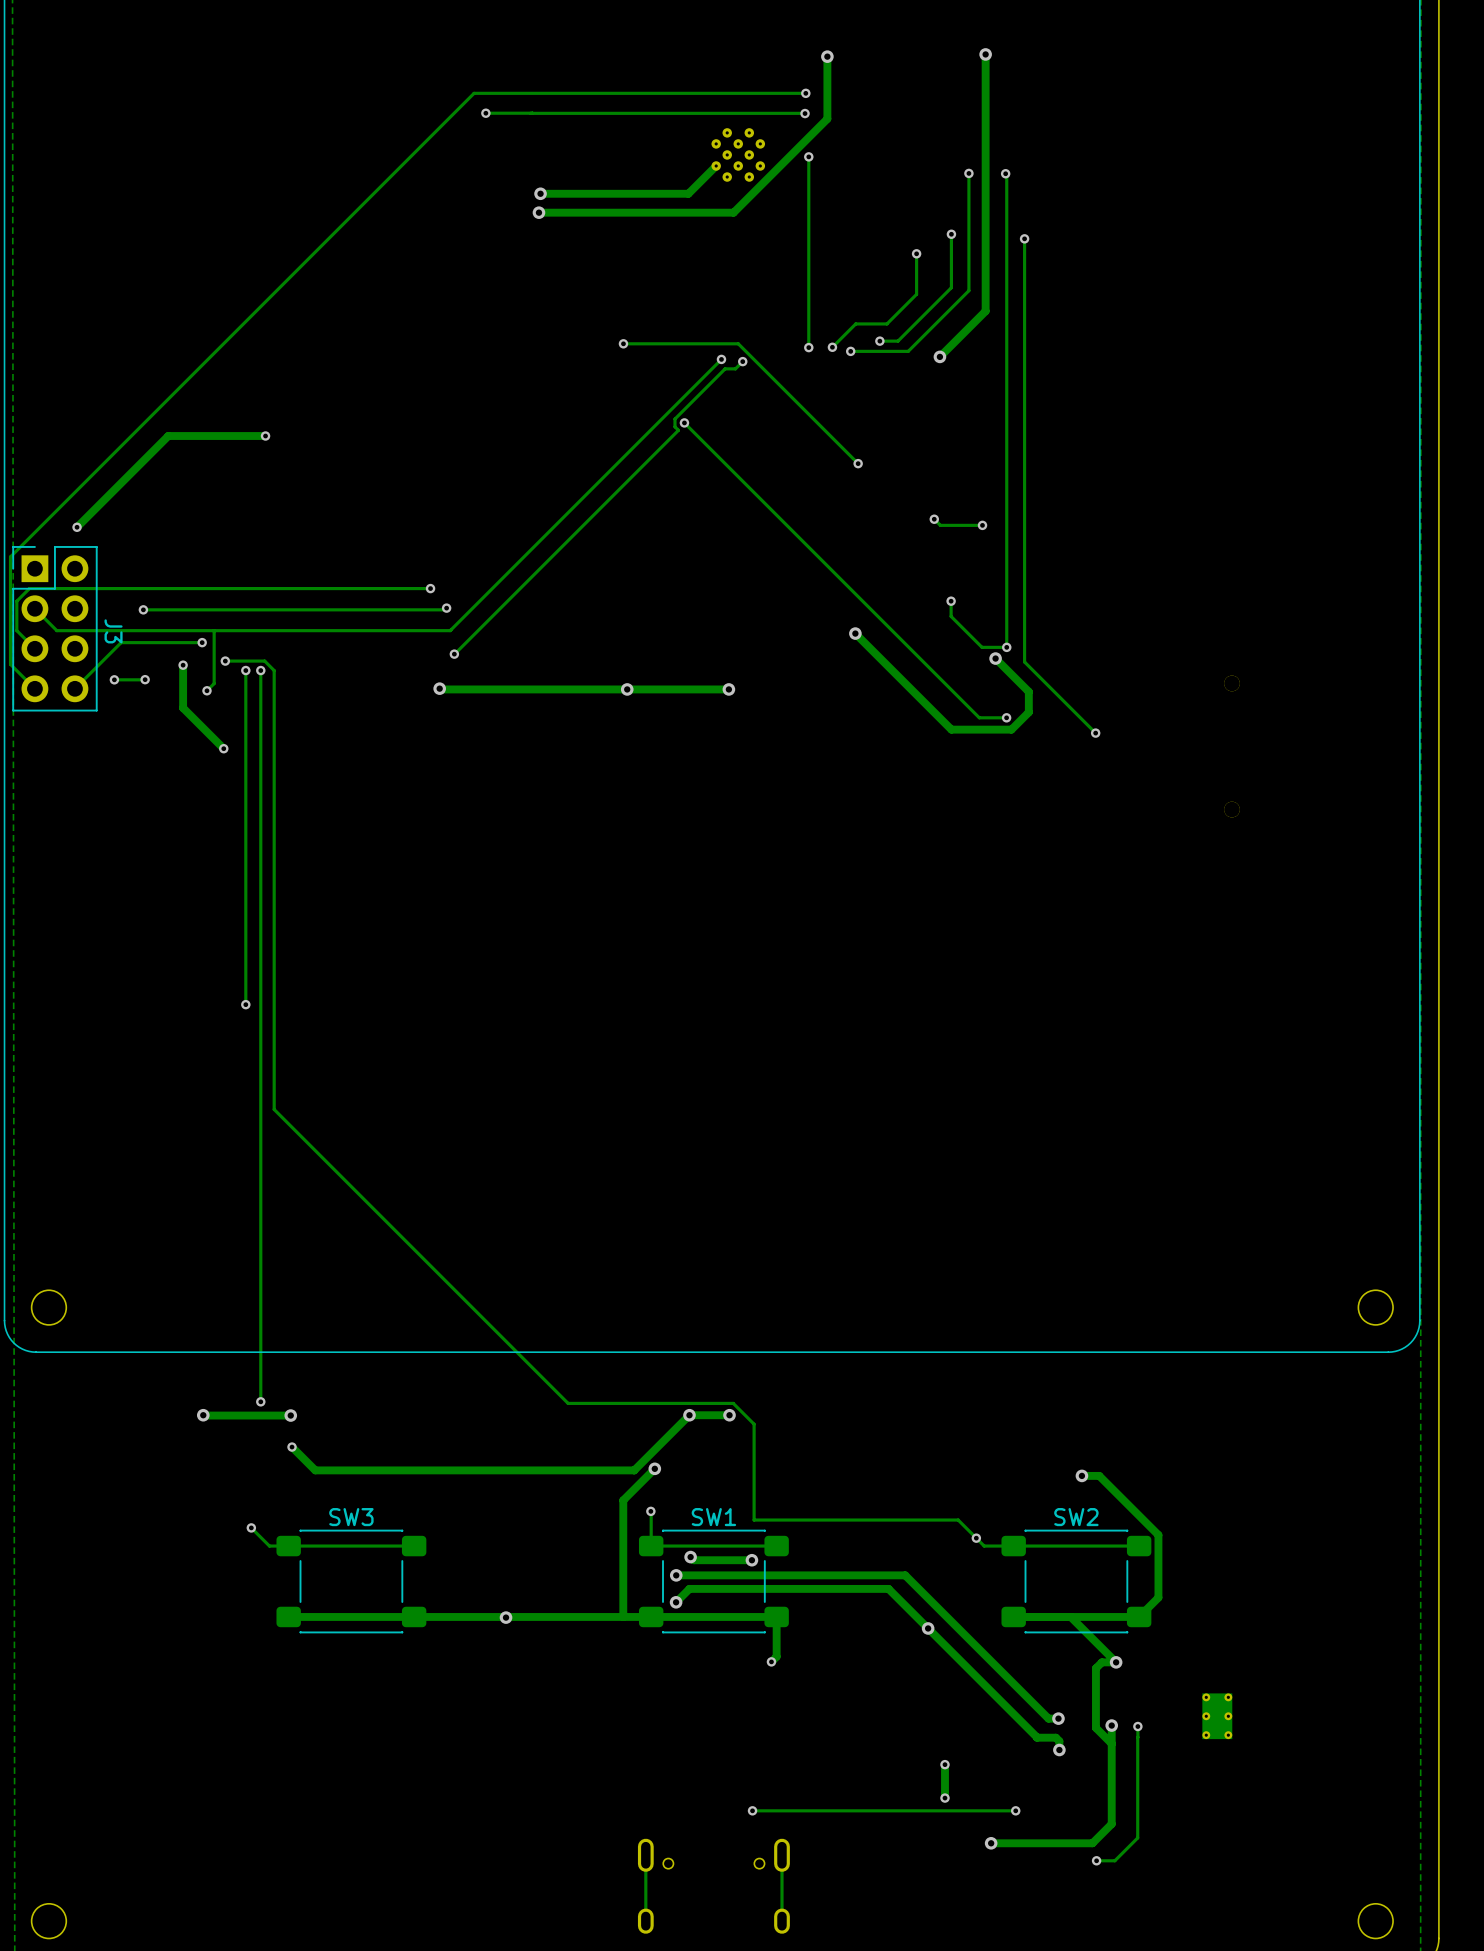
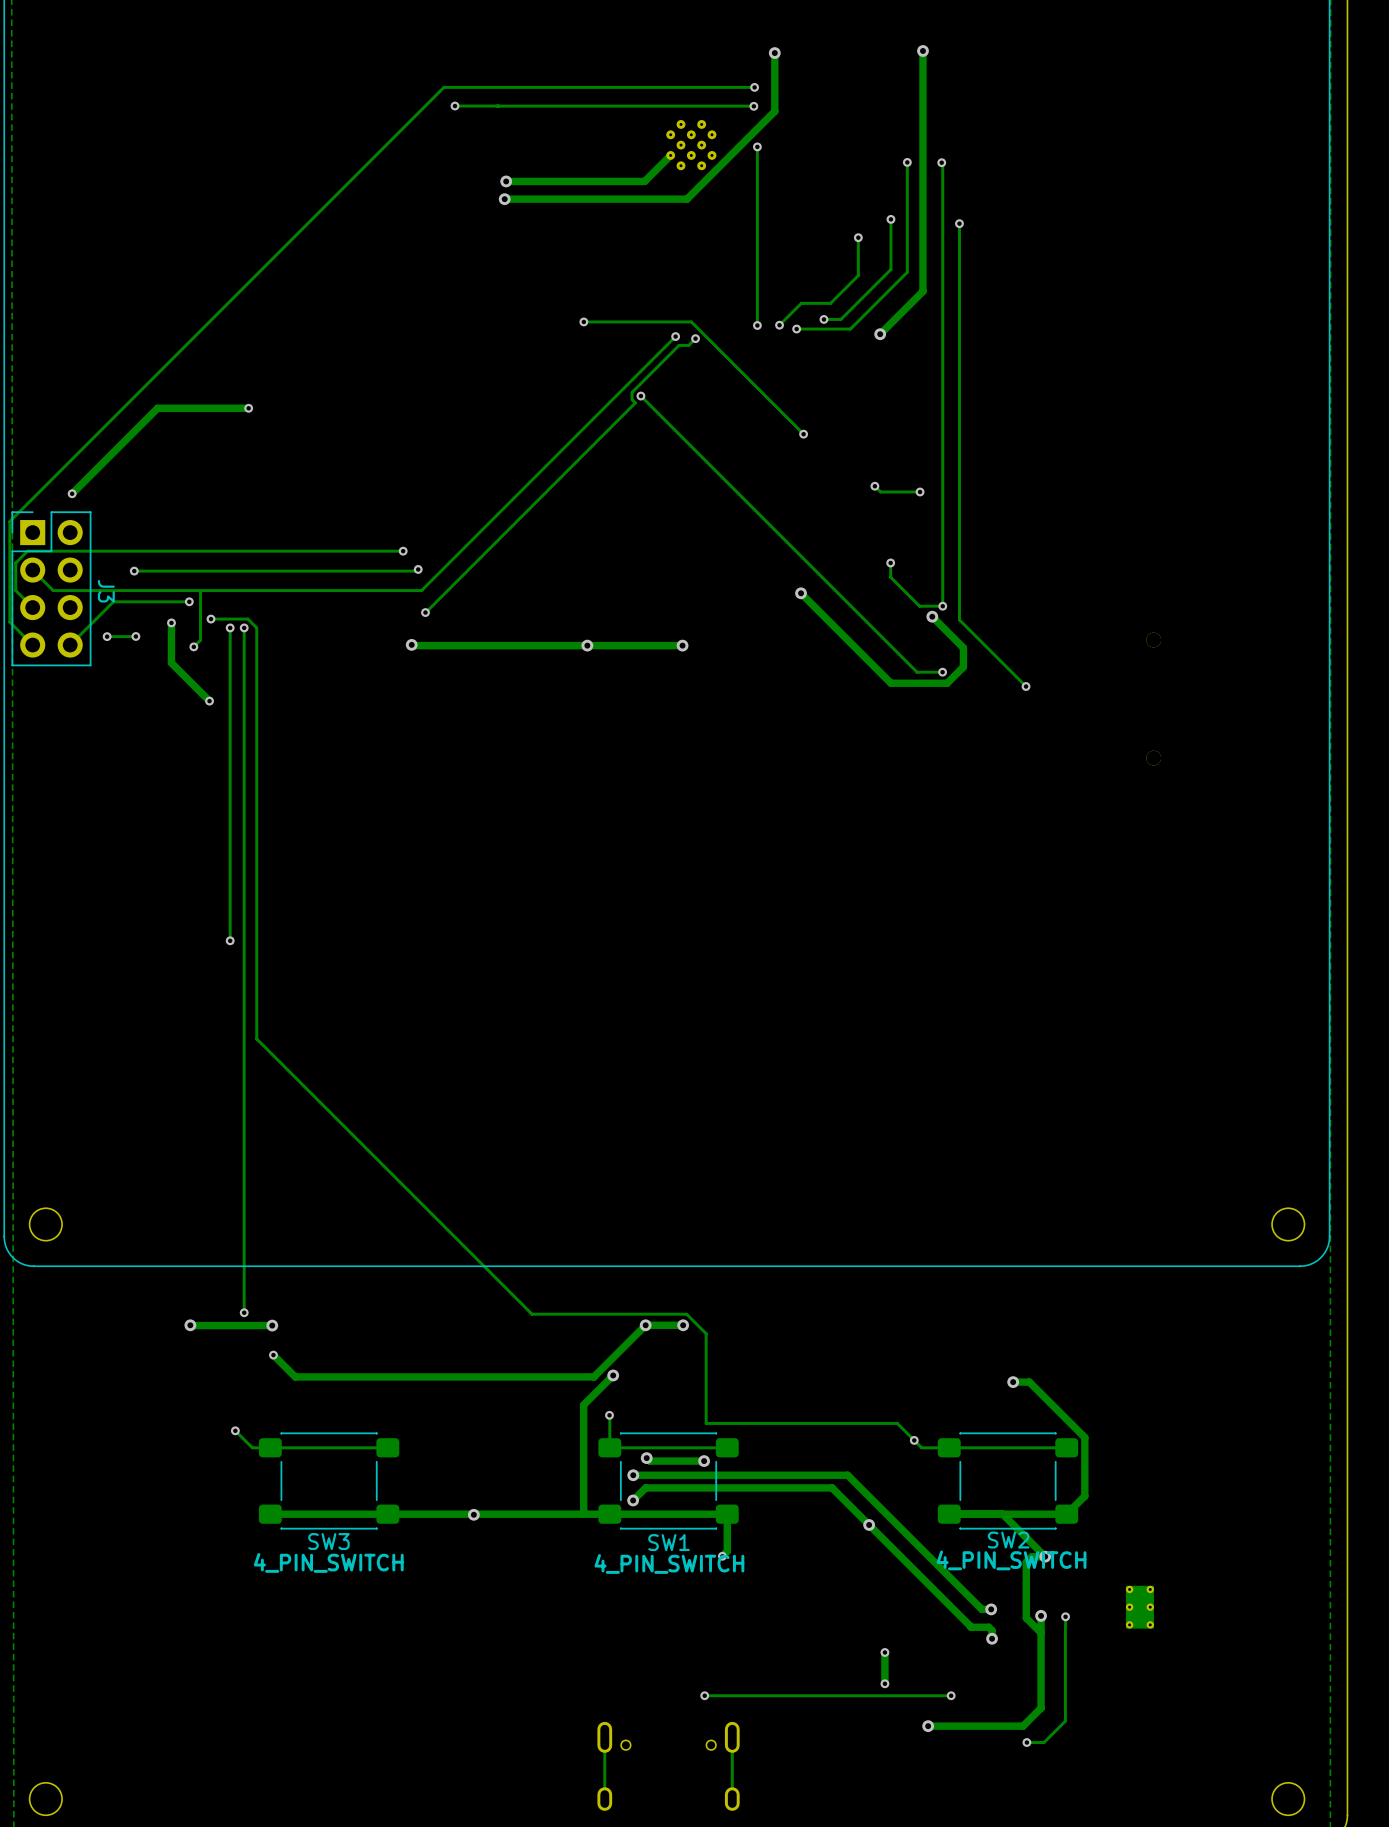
SW3 name position: SW3 (351, 1517) -> SW3 (328, 1541)
SW1 name position: SW1 (713, 1517) -> SW1 (669, 1542)
SW2 name position: SW2 (1076, 1517) -> SW2 (1008, 1540)
text: none -> 4_PIN_SWITCH (1011, 1560)
text: none -> 4_PIN_SWITCH (328, 1562)
text: none -> 4_PIN_SWITCH (669, 1563)

